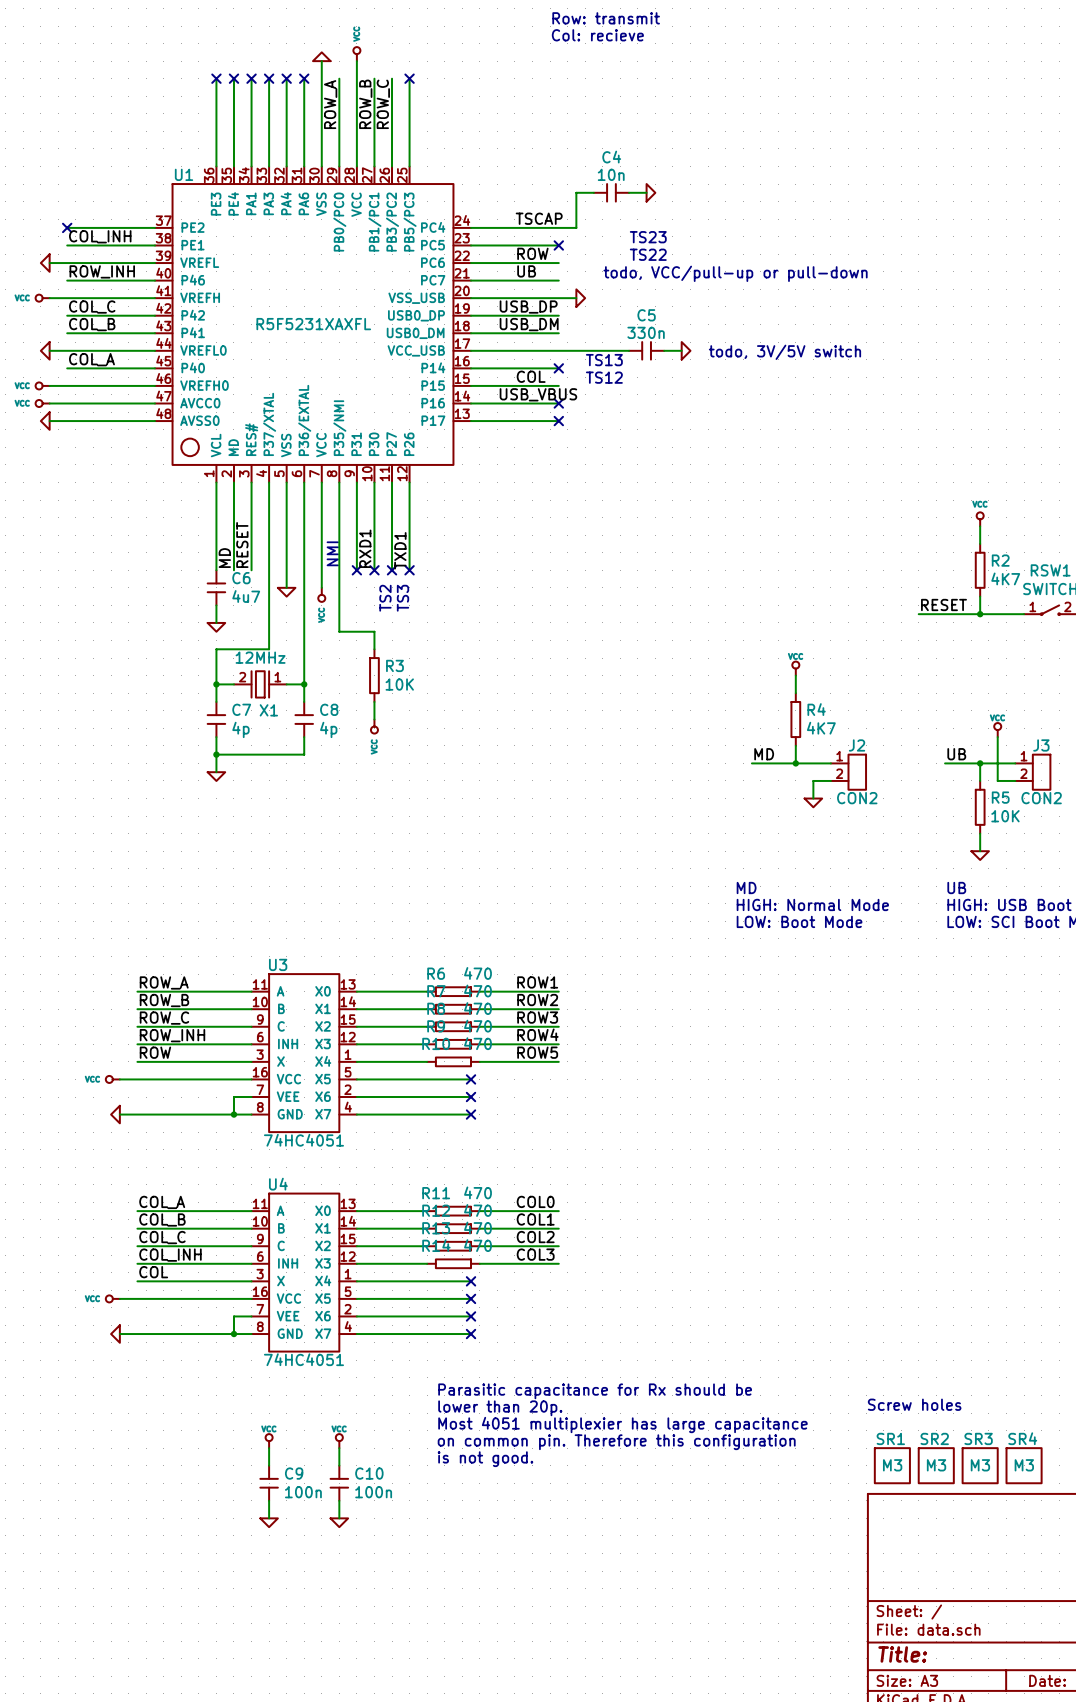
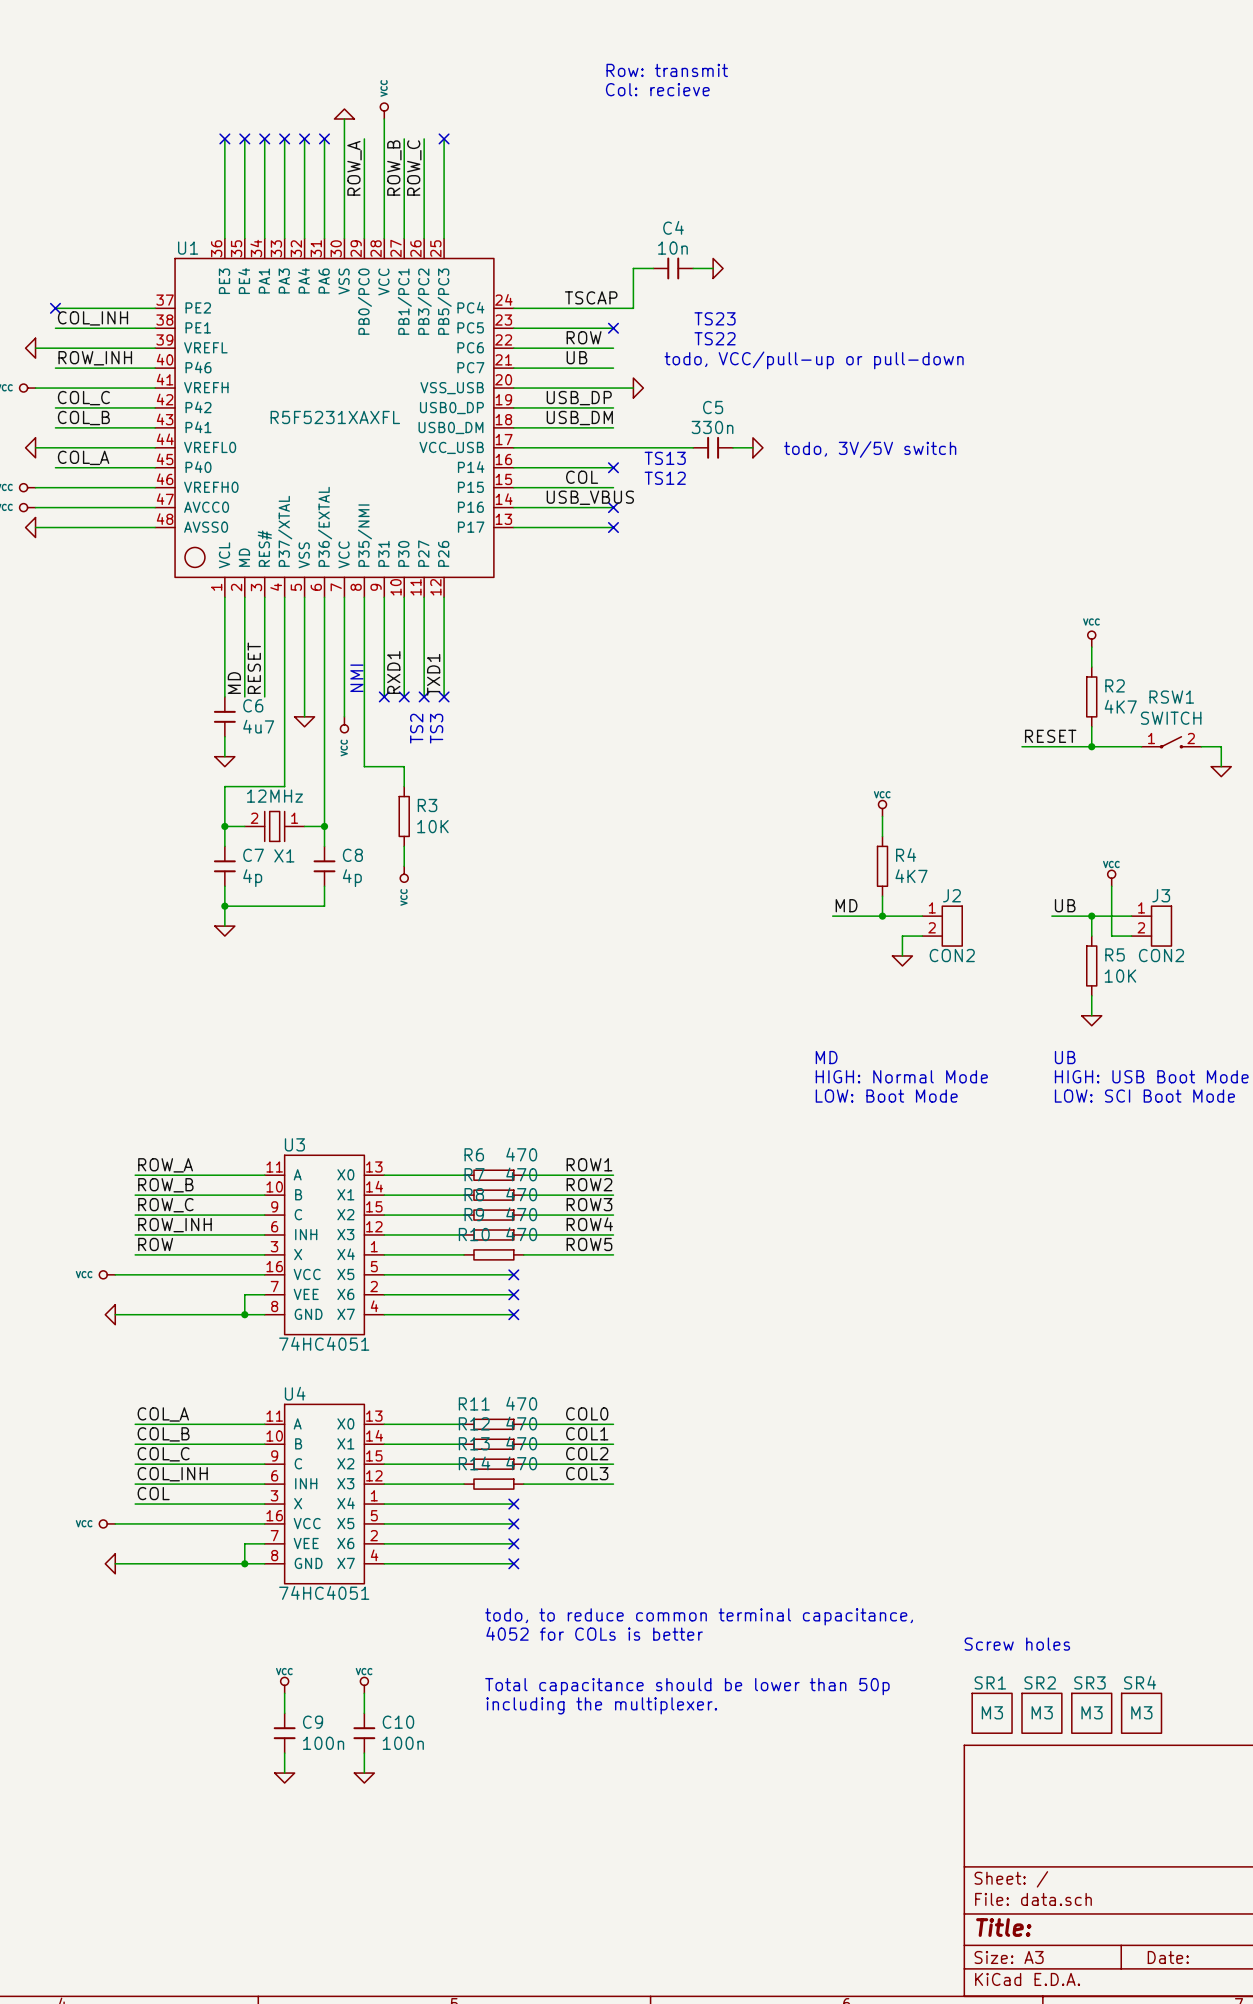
text: none -> todo, to reduce common terminal capacitance, (699, 1616)
text: Parasitic capacitance for Rx should be (595, 1391) -> none
text: none -> 4052 for COLs is better (594, 1633)
text: lower than 20p. (500, 1408) -> none
text: Most 4051 multiplexier has large capacitance (622, 1425) -> none
text: on common pin. Therefore this configuration (616, 1442) -> none
text: none -> Total capacitance should be lower than 50p (687, 1686)
text: is not good. (485, 1459) -> none
text: none -> including the multiplexer. (601, 1705)

